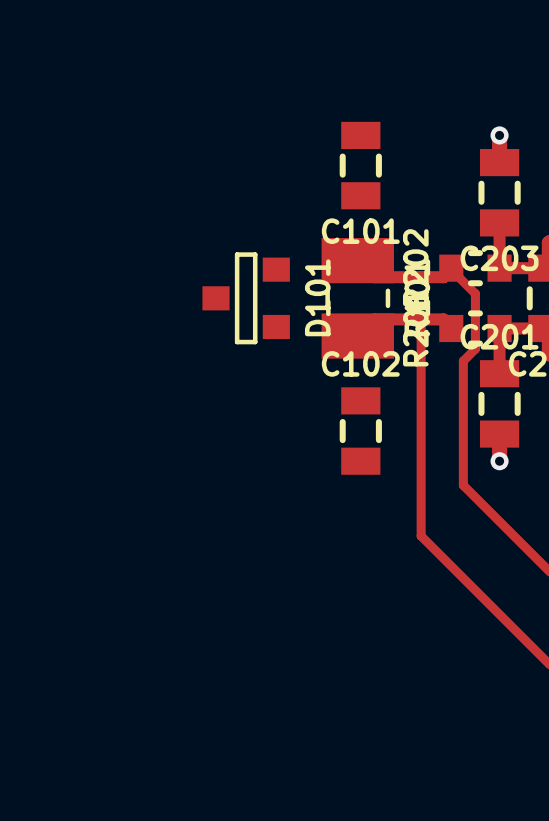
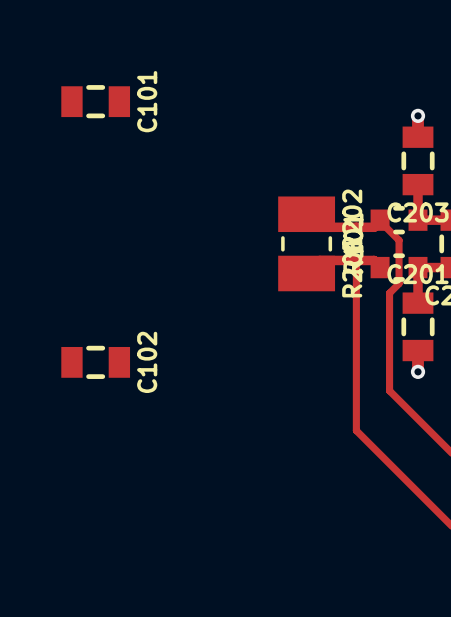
C101 rotation: 0° (360, 165) -> 90° clockwise (95, 101)
C101 position: (360, 165) -> (95, 101)
C101 name position: C101 (360, 231) -> C101 (147, 101)
D101: (246, 298) -> none
C102 rotation: 0° (360, 431) -> 90° clockwise (95, 362)
C102 position: (360, 431) -> (95, 362)

